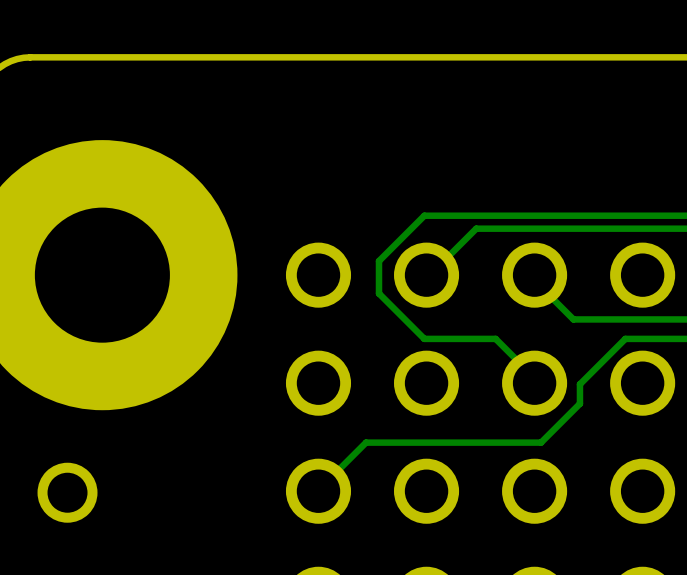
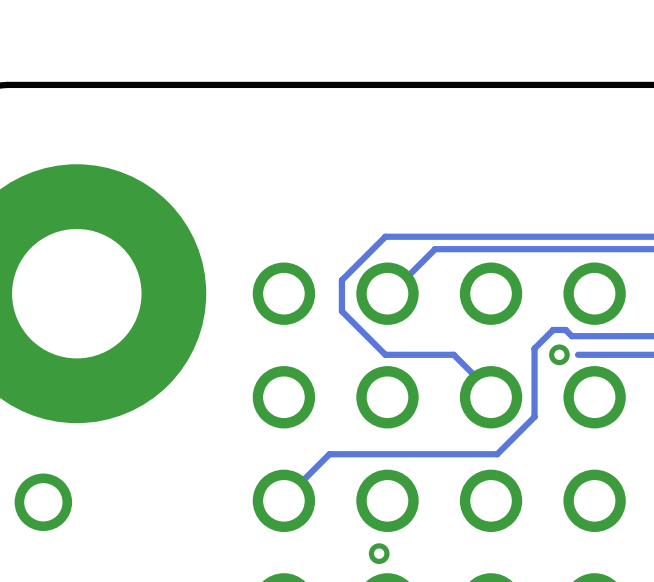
track: (534, 275) (534, 280) (573, 319) (618, 319) -> none
via: none -> (559, 354)
track: (625, 338) (579, 384) -> (571, 336) (565, 329) (553, 329) (534, 348) (534, 398)
via: none -> (379, 553)

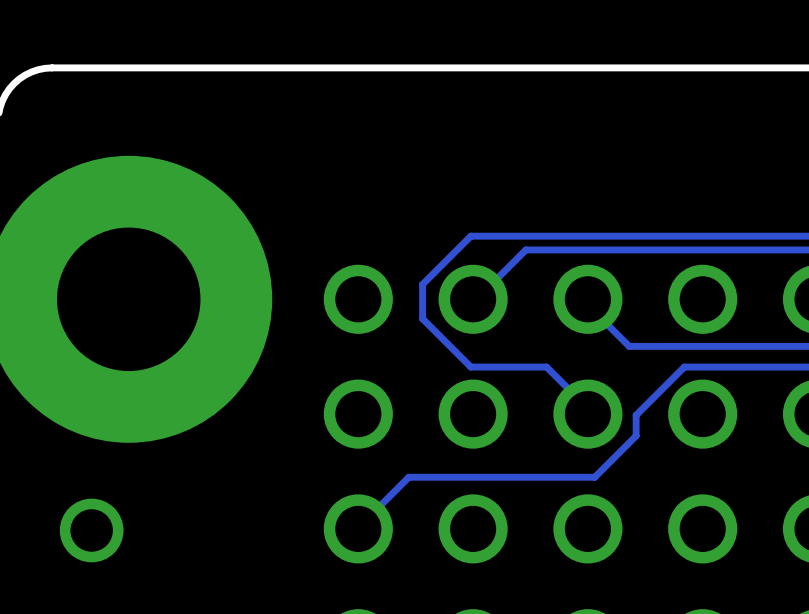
track: none -> (587, 299) (587, 305) (629, 346) (677, 346)
track: (571, 336) (565, 329) (553, 329) (534, 348) (534, 398) -> (684, 367) (636, 415)
via: (559, 354) -> none
via: (379, 553) -> none

